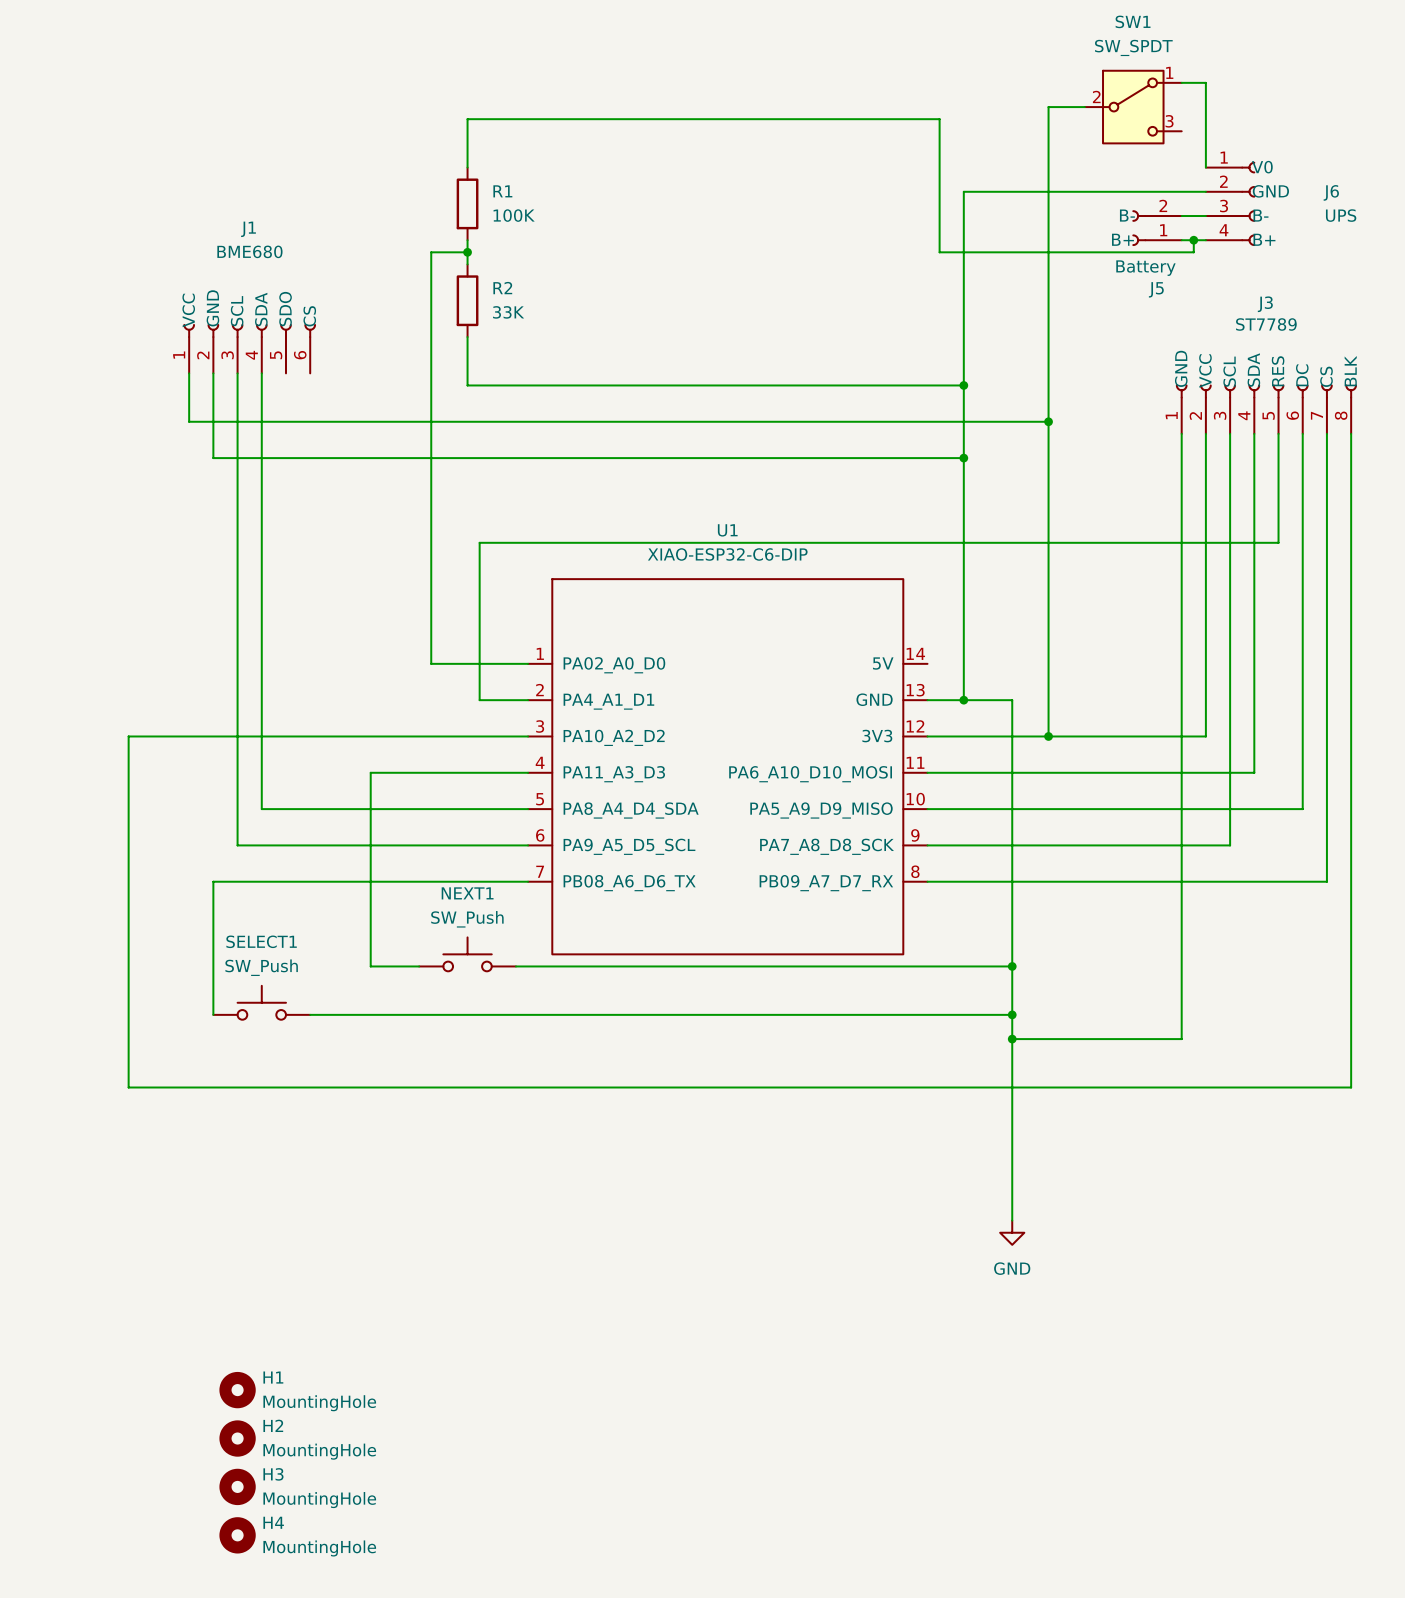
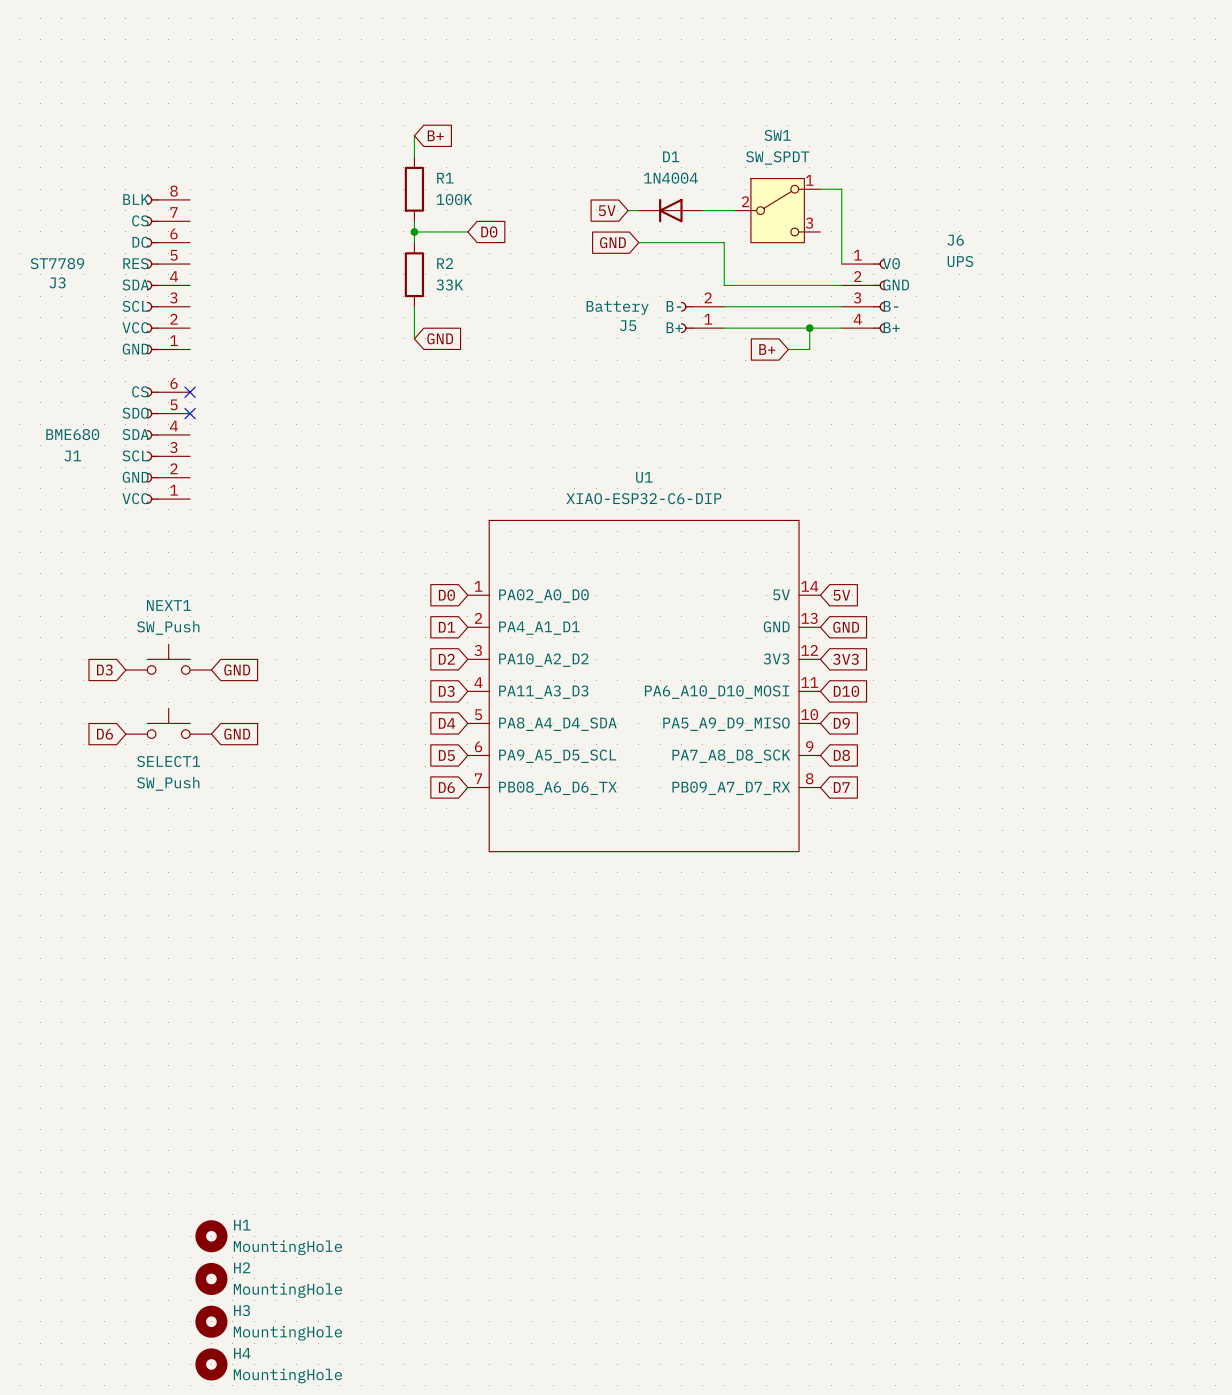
wire: (1181, 82) (1205, 82) (1205, 167) -> none
wire: (1084, 107) (1048, 107) (1048, 736) -> none
SW1 position: (1133, 107) -> (777, 210)
wire: (467, 143) (467, 119) (939, 119) (939, 252) (1193, 252) (1193, 240) -> none
global label: none -> B+ (435, 135)
wire: (1205, 191) (963, 191) (963, 700) -> none
J6 name position: J6 (1331, 192) -> J6 (955, 240)
wire: none -> (820, 189) (841, 189) (841, 264)
J6 position: (1230, 203) -> (863, 296)
J6 value position: UPS (1341, 215) -> UPS (960, 261)
wire: (1181, 216) (1205, 216) -> none
global label: none -> 5V (607, 210)
wire: none -> (628, 210) (638, 210)
D1: none -> 1N4004 (670, 210)
wire: none -> (702, 210) (734, 210)
J5 position: (1157, 228) -> (702, 317)
wire: (1181, 240) (1205, 240) -> none
junction: (1193, 240) -> none
wire: (467, 252) (431, 252) (431, 663) (528, 663) -> (414, 231) (467, 231)
global label: none -> D0 (489, 231)
global label: none -> GND (612, 242)
wire: none -> (638, 242) (724, 242) (724, 285) (841, 285)
J5 value position: Battery (1145, 268) -> Battery (617, 307)
J5 name position: J5 (1156, 289) -> J5 (628, 325)
J3 name position: J3 (1265, 304) -> J3 (57, 282)
J3 value position: ST7789 (1266, 324) -> ST7789 (57, 263)
J1 rotation: 0° (249, 330) -> 90° counterclockwise (152, 445)
wire: none -> (724, 306) (841, 306)
J1 position: (249, 348) -> (168, 445)
wire: none -> (724, 328) (841, 328)
junction: none -> (809, 328)
wire: (189, 373) (189, 421) (1048, 421) -> none
wire: (213, 373) (213, 458) (963, 458) -> none
wire: (237, 373) (237, 845) (528, 845) -> none
wire: (261, 373) (261, 809) (528, 809) -> none
wire: (467, 373) (467, 385) (891, 385) -> none
global label: none -> GND (440, 338)
global label: none -> B+ (767, 349)
wire: (915, 385) (963, 385) -> (809, 349) (809, 328)
junction: (963, 385) -> none
J3 rotation: 0° (1266, 391) -> 90° counterclockwise (152, 274)
J3 position: (1266, 409) -> (168, 274)
junction: (1048, 421) -> none
no-connect mark: none -> (190, 392)
wire: (1181, 433) (1181, 1039) (1012, 1039) -> none
wire: (1205, 433) (1205, 736) (927, 736) -> none
wire: (1230, 433) (1230, 845) (927, 845) -> none
wire: (1254, 433) (1254, 772) (927, 772) -> none
wire: (1278, 433) (1278, 542) (479, 542) (479, 700) (528, 700) -> none
wire: (1302, 433) (1302, 809) (927, 809) -> none
wire: (1326, 433) (1326, 881) (927, 881) -> none
wire: (1351, 433) (1351, 1087) (128, 1087) (128, 736) (528, 736) -> none
no-connect mark: none -> (190, 413)
junction: (963, 458) -> none
global label: none -> D0 (446, 595)
global label: none -> 5V (841, 595)
global label: none -> D1 (447, 627)
wire: (927, 700) (1012, 700) (1012, 1220) -> none
global label: none -> GND (846, 627)
junction: (963, 700) -> none
global label: none -> D2 (446, 659)
global label: none -> 3V3 (845, 659)
junction: (1048, 736) -> none
global label: none -> D3 (104, 670)
global label: none -> GND (237, 670)
global label: none -> D3 (446, 691)
wire: (528, 772) (370, 772) (370, 966) (419, 966) -> none
global label: none -> D10 (846, 691)
global label: none -> D4 (447, 723)
global label: none -> D9 (841, 723)
global label: none -> D6 (104, 734)
global label: none -> GND (237, 734)
global label: none -> D5 (446, 755)
global label: none -> D8 (841, 755)
global label: none -> D6 (446, 787)
wire: (528, 881) (213, 881) (213, 1014) -> none
global label: none -> D7 (841, 787)
SELECT1 name position: SELECT1 (261, 941) -> SELECT1 (168, 761)
NEXT1 position: (467, 954) -> (168, 659)
wire: (515, 966) (1012, 966) -> none
junction: (1012, 966) -> none
SELECT1 value position: SW_Push (261, 967) -> SW_Push (168, 783)
SELECT1 position: (261, 1002) -> (168, 723)
wire: (310, 1014) (1012, 1014) -> none
junction: (1012, 1014) -> none
junction: (1012, 1039) -> none
power symbol: GND (1012, 1232) -> none

